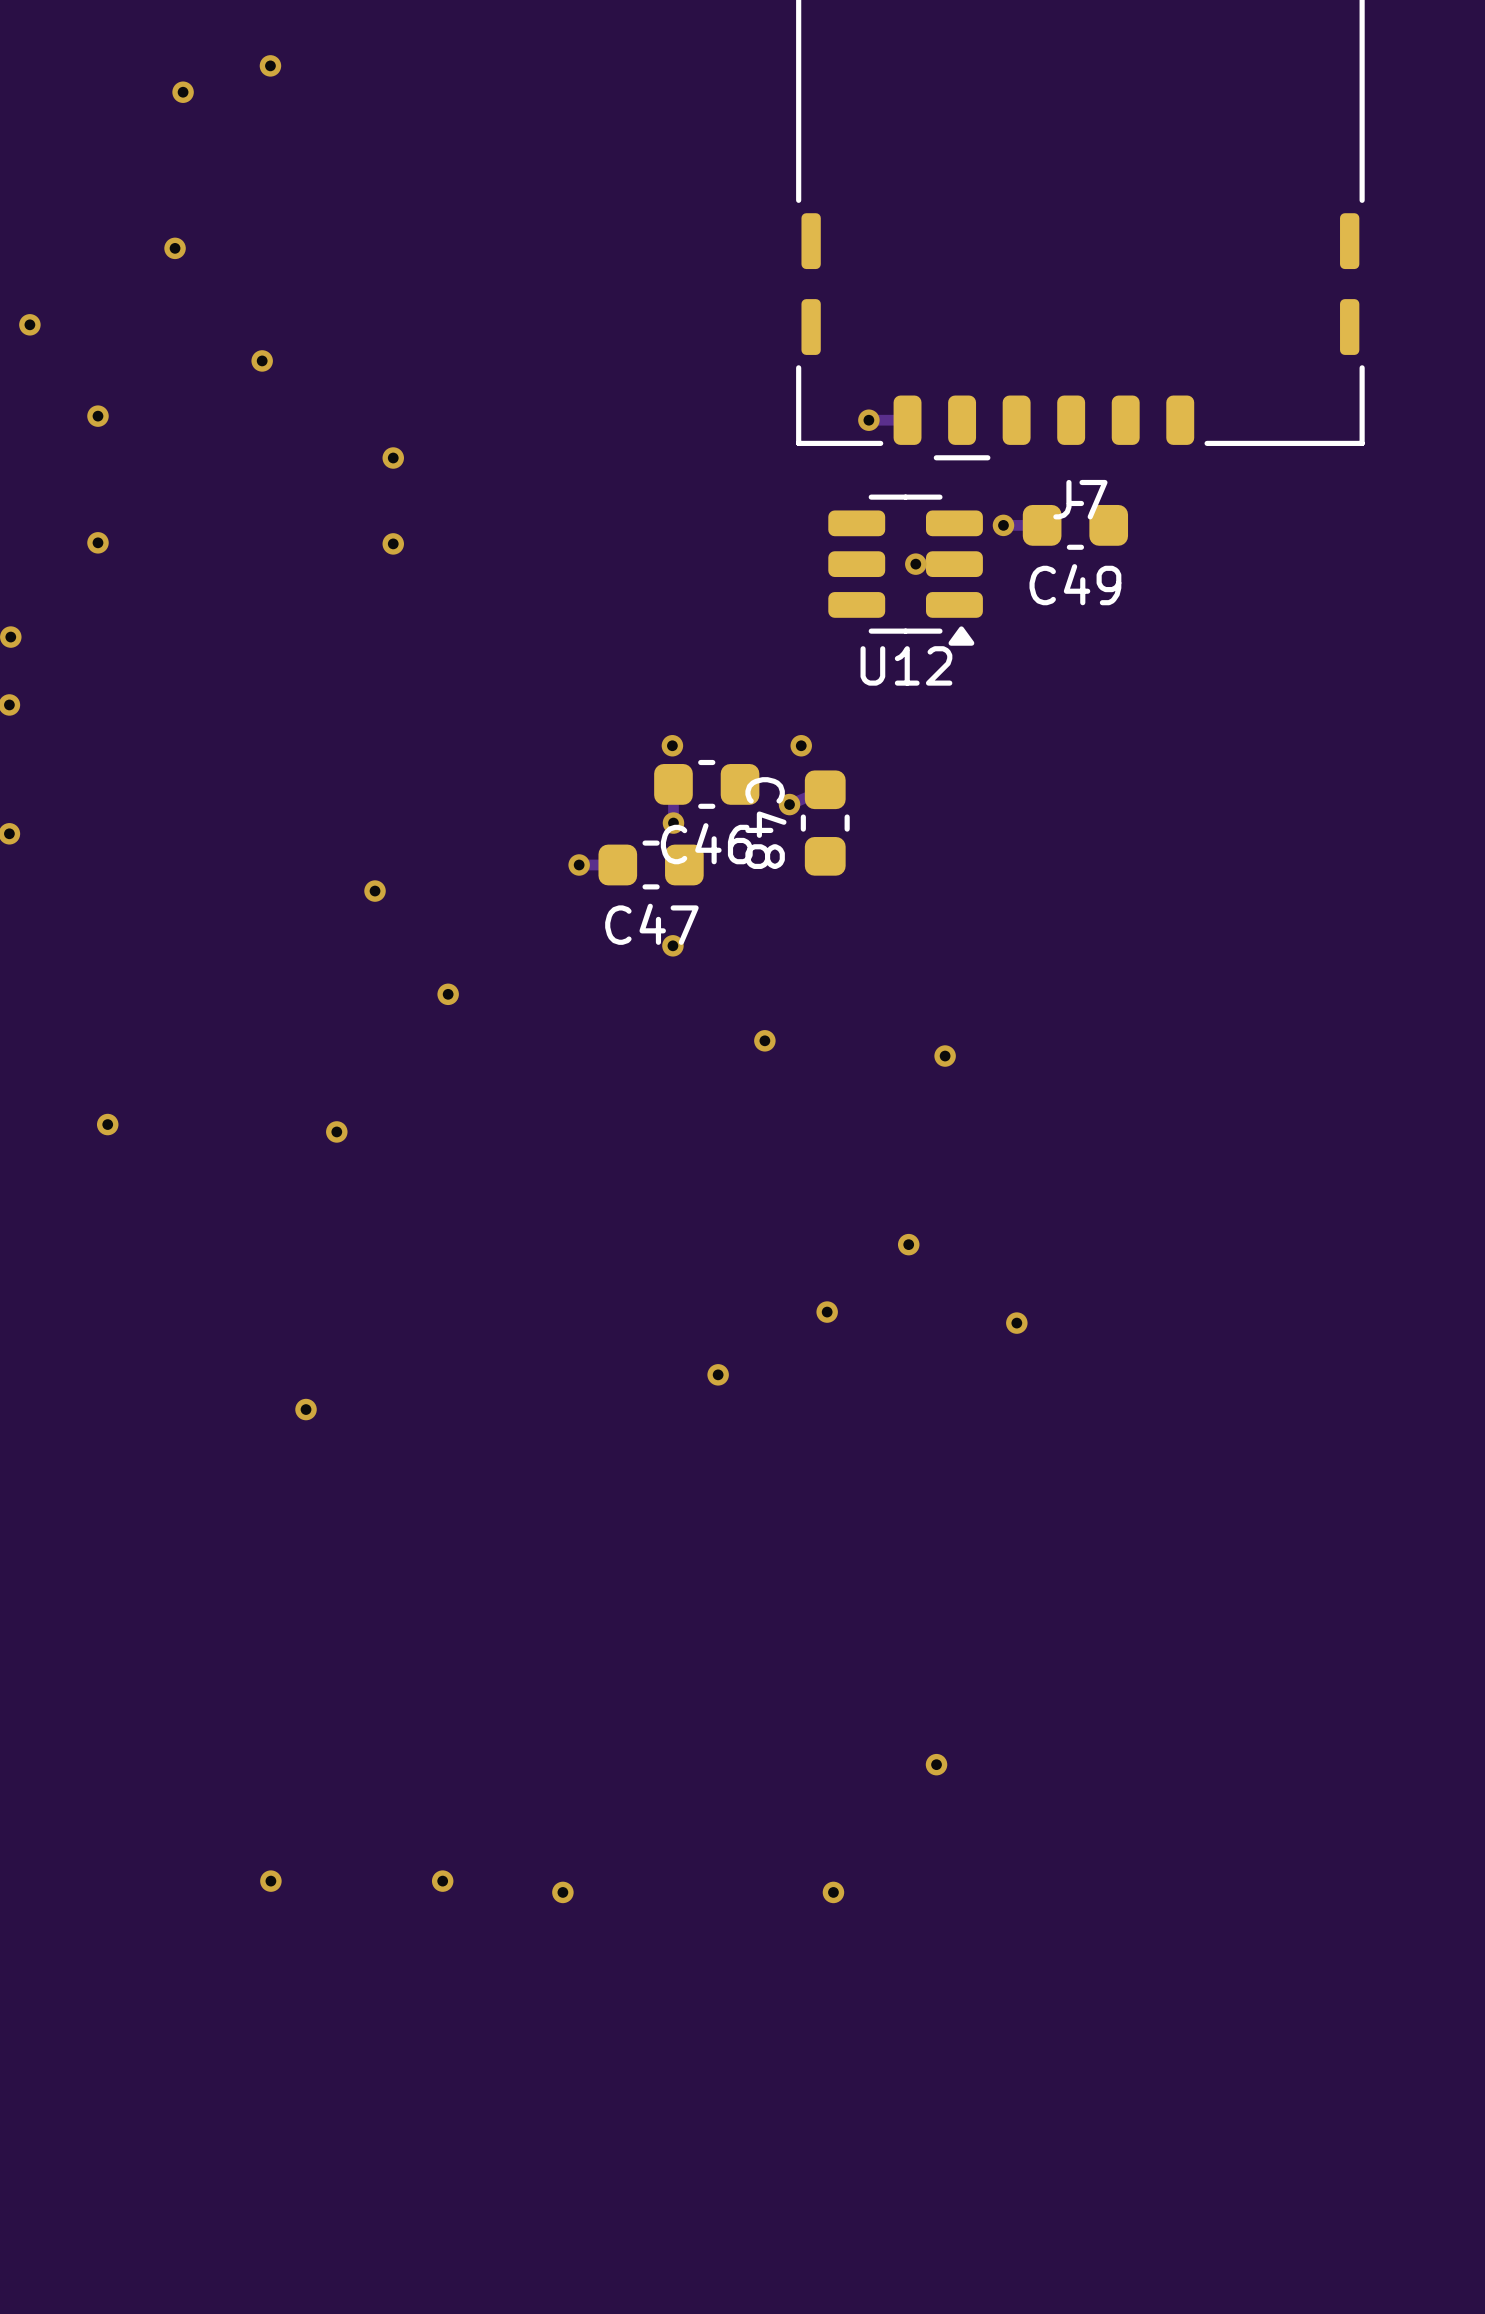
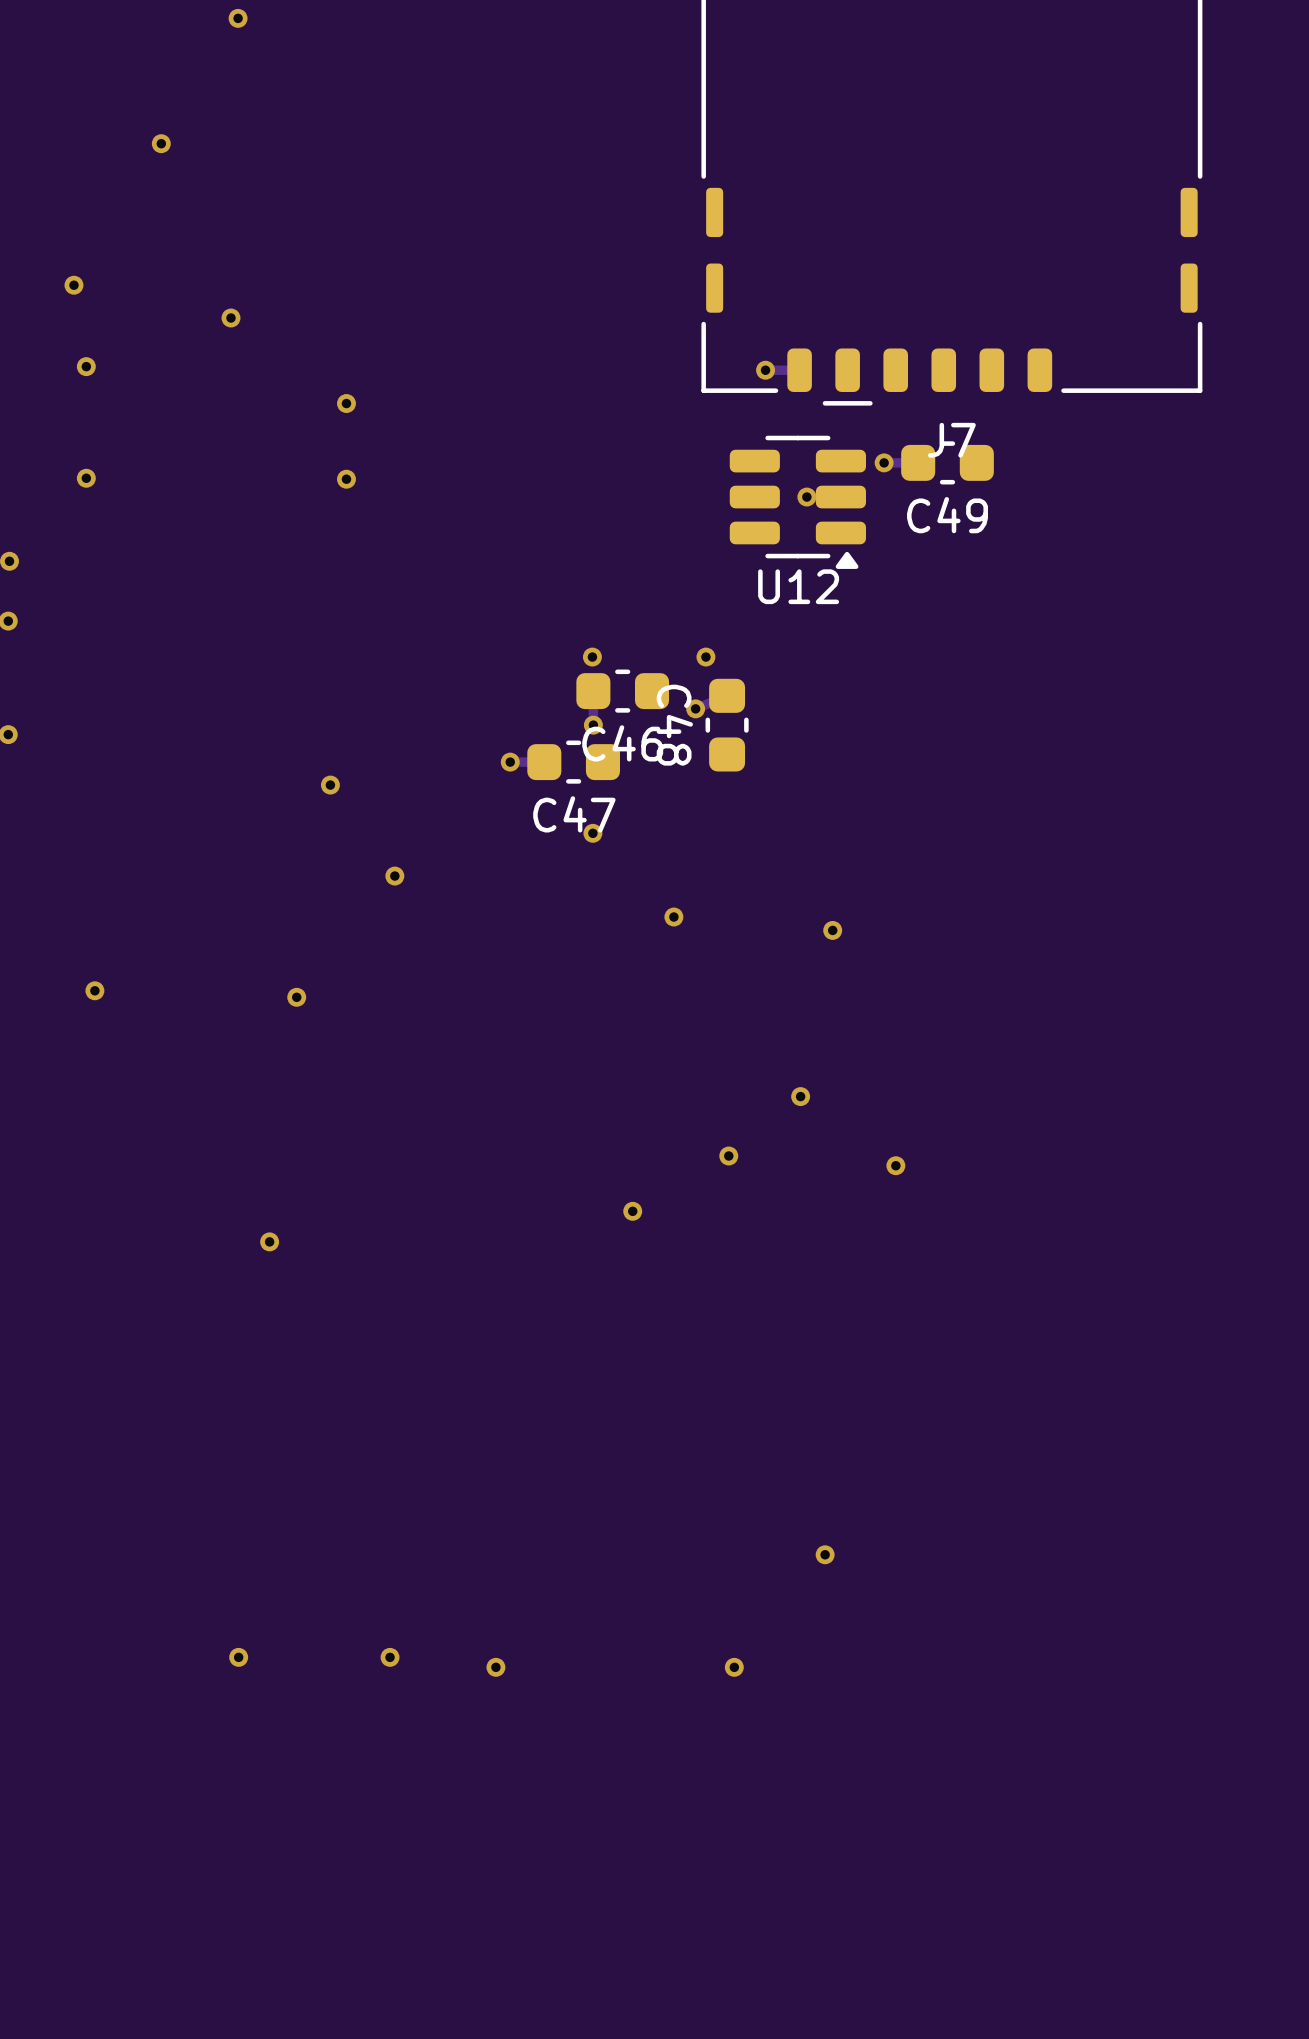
via position: (270, 65) -> (238, 18)
via: (183, 92) -> none
via: none -> (161, 143)
via: (175, 248) -> none
via position: (29, 324) -> (73, 285)

